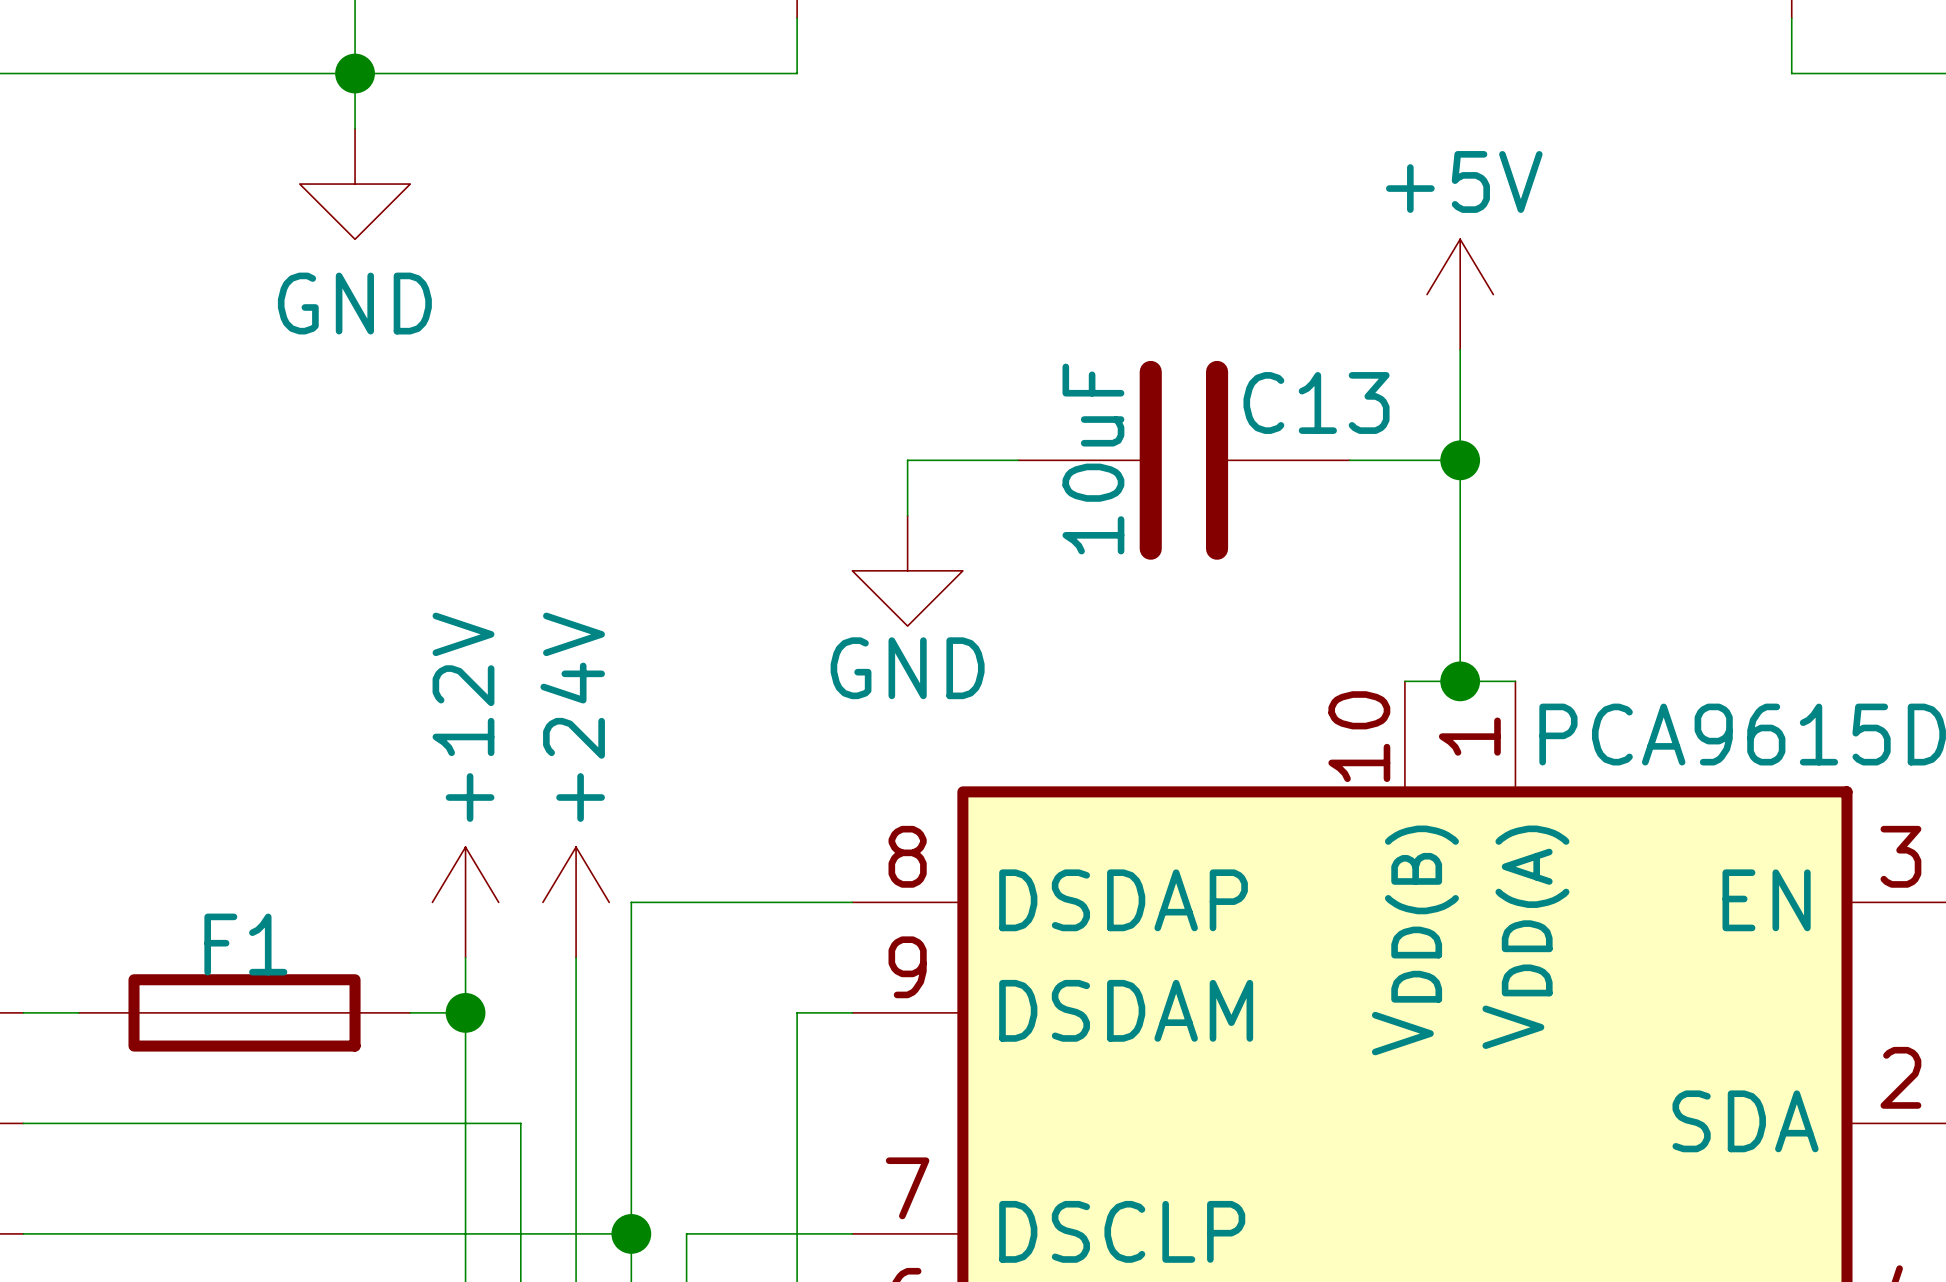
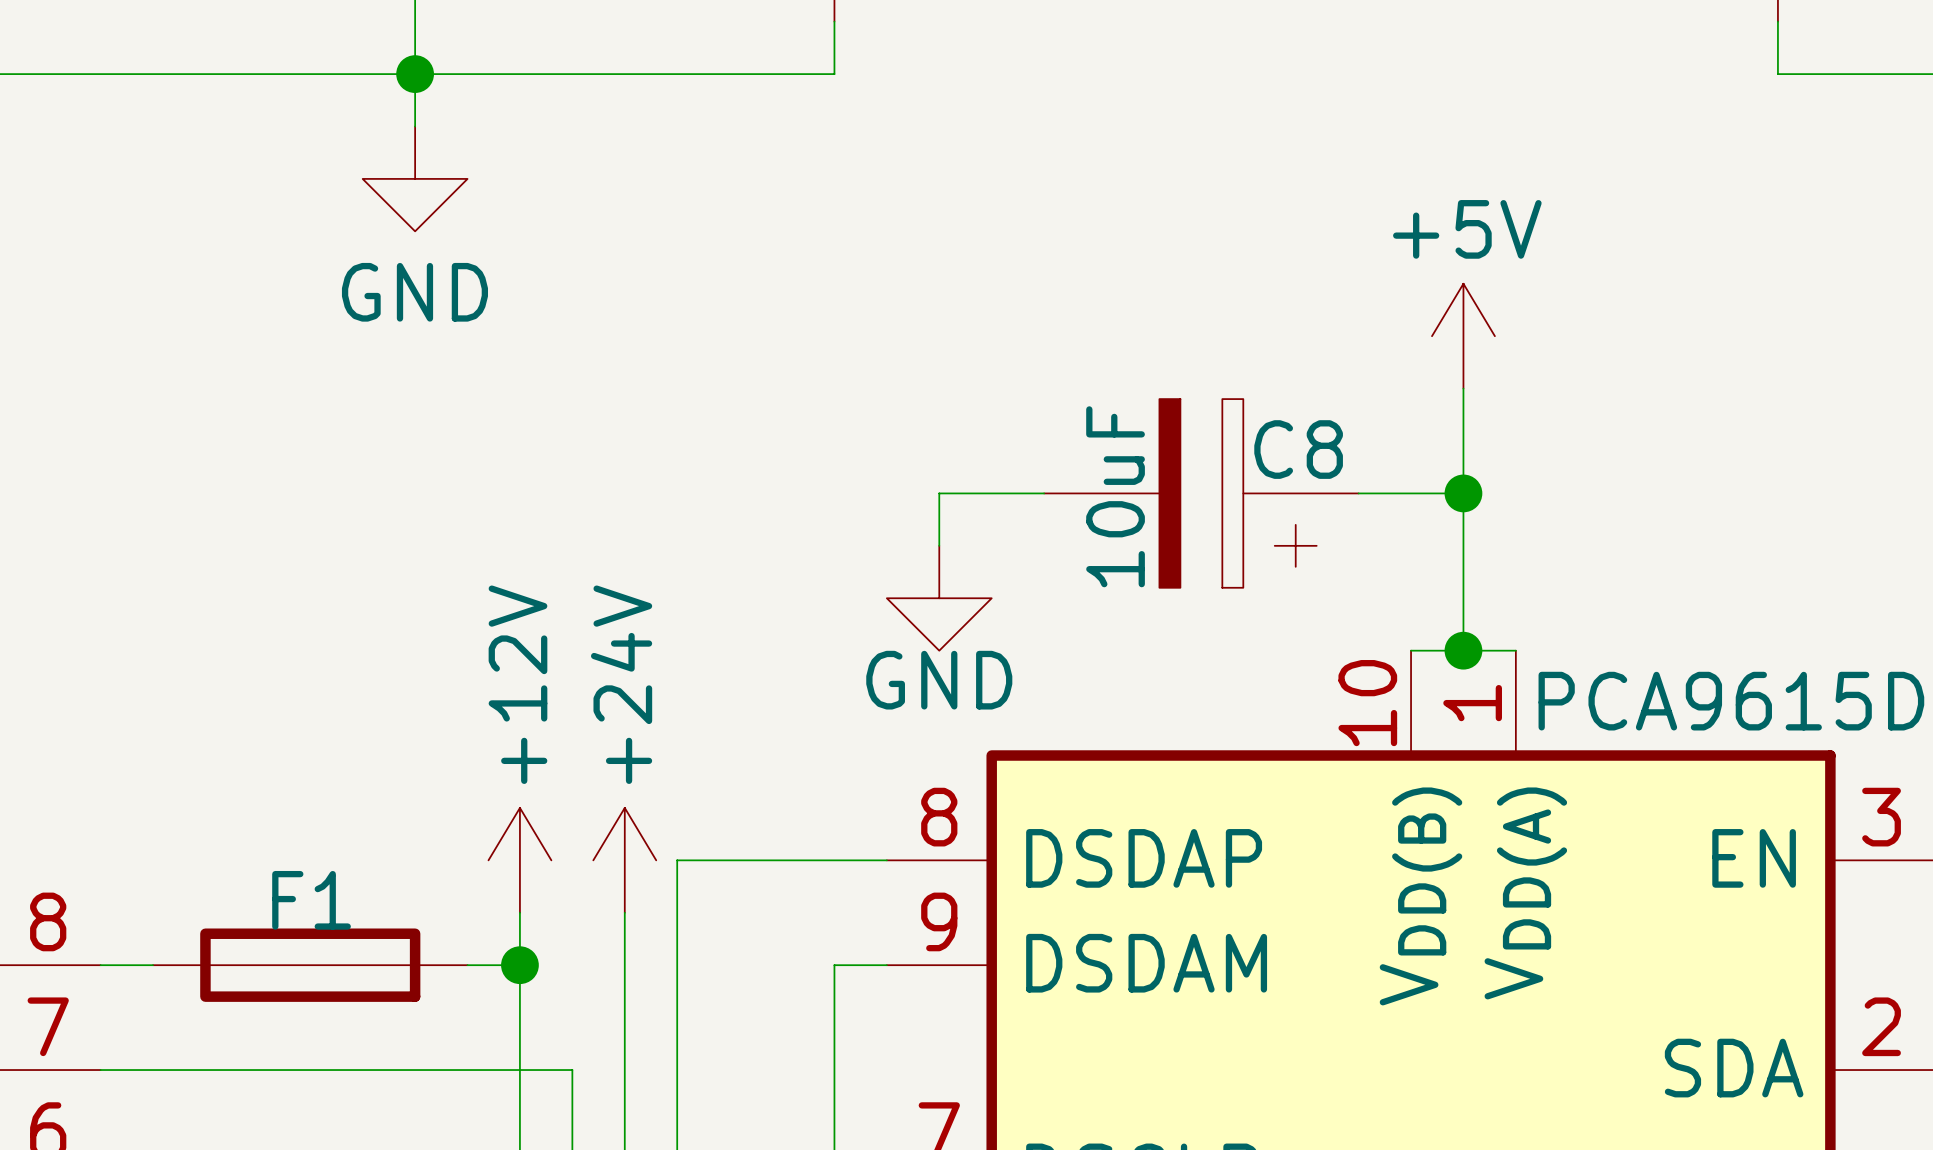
power symbol position: +5V (1460, 294) -> +5V (1463, 336)
wire: (1018, 460) (907, 460) (907, 515) -> (1044, 493) (939, 493) (939, 545)
C13: 10uF (1183, 460) -> none
wire: (1349, 460) (1460, 460) -> (1358, 493) (1463, 493)
junction position: (1460, 460) -> (1463, 493)
C8: none -> 10uF (1201, 493)
power symbol position: GND (907, 570) -> GND (939, 598)
power symbol text position: GND (907, 668) -> GND (939, 680)

